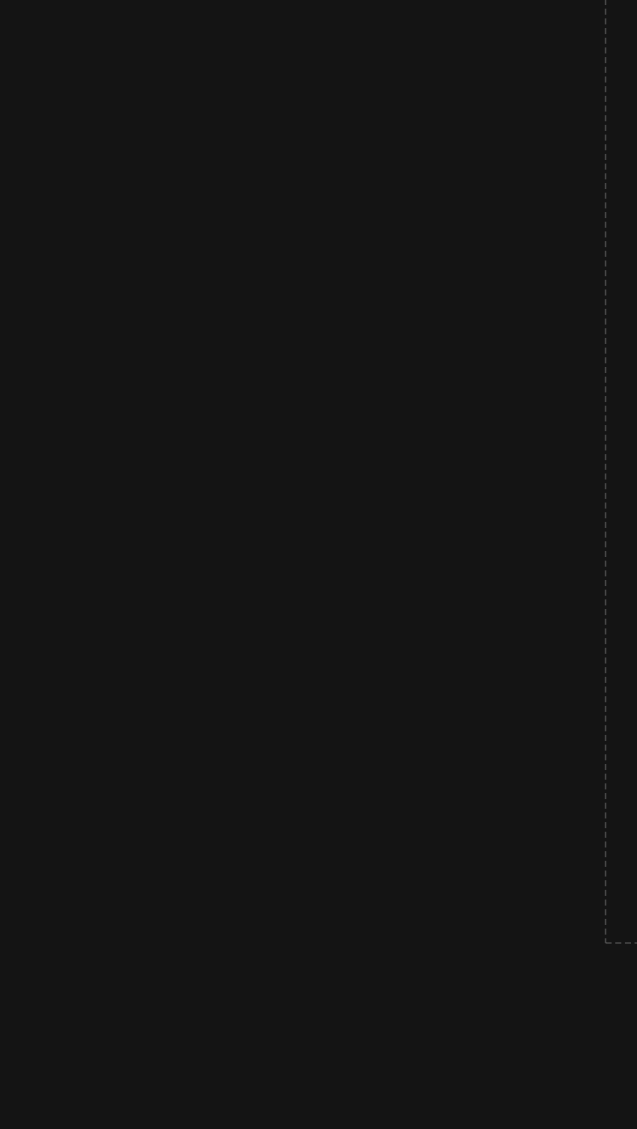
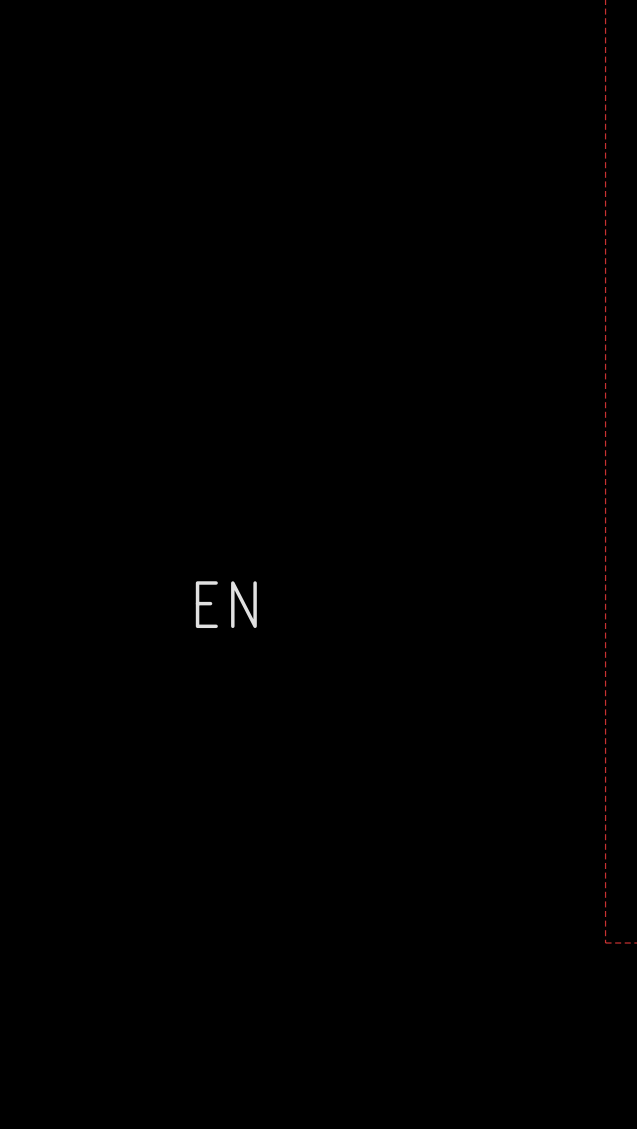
text: none -> EN (226, 604)

